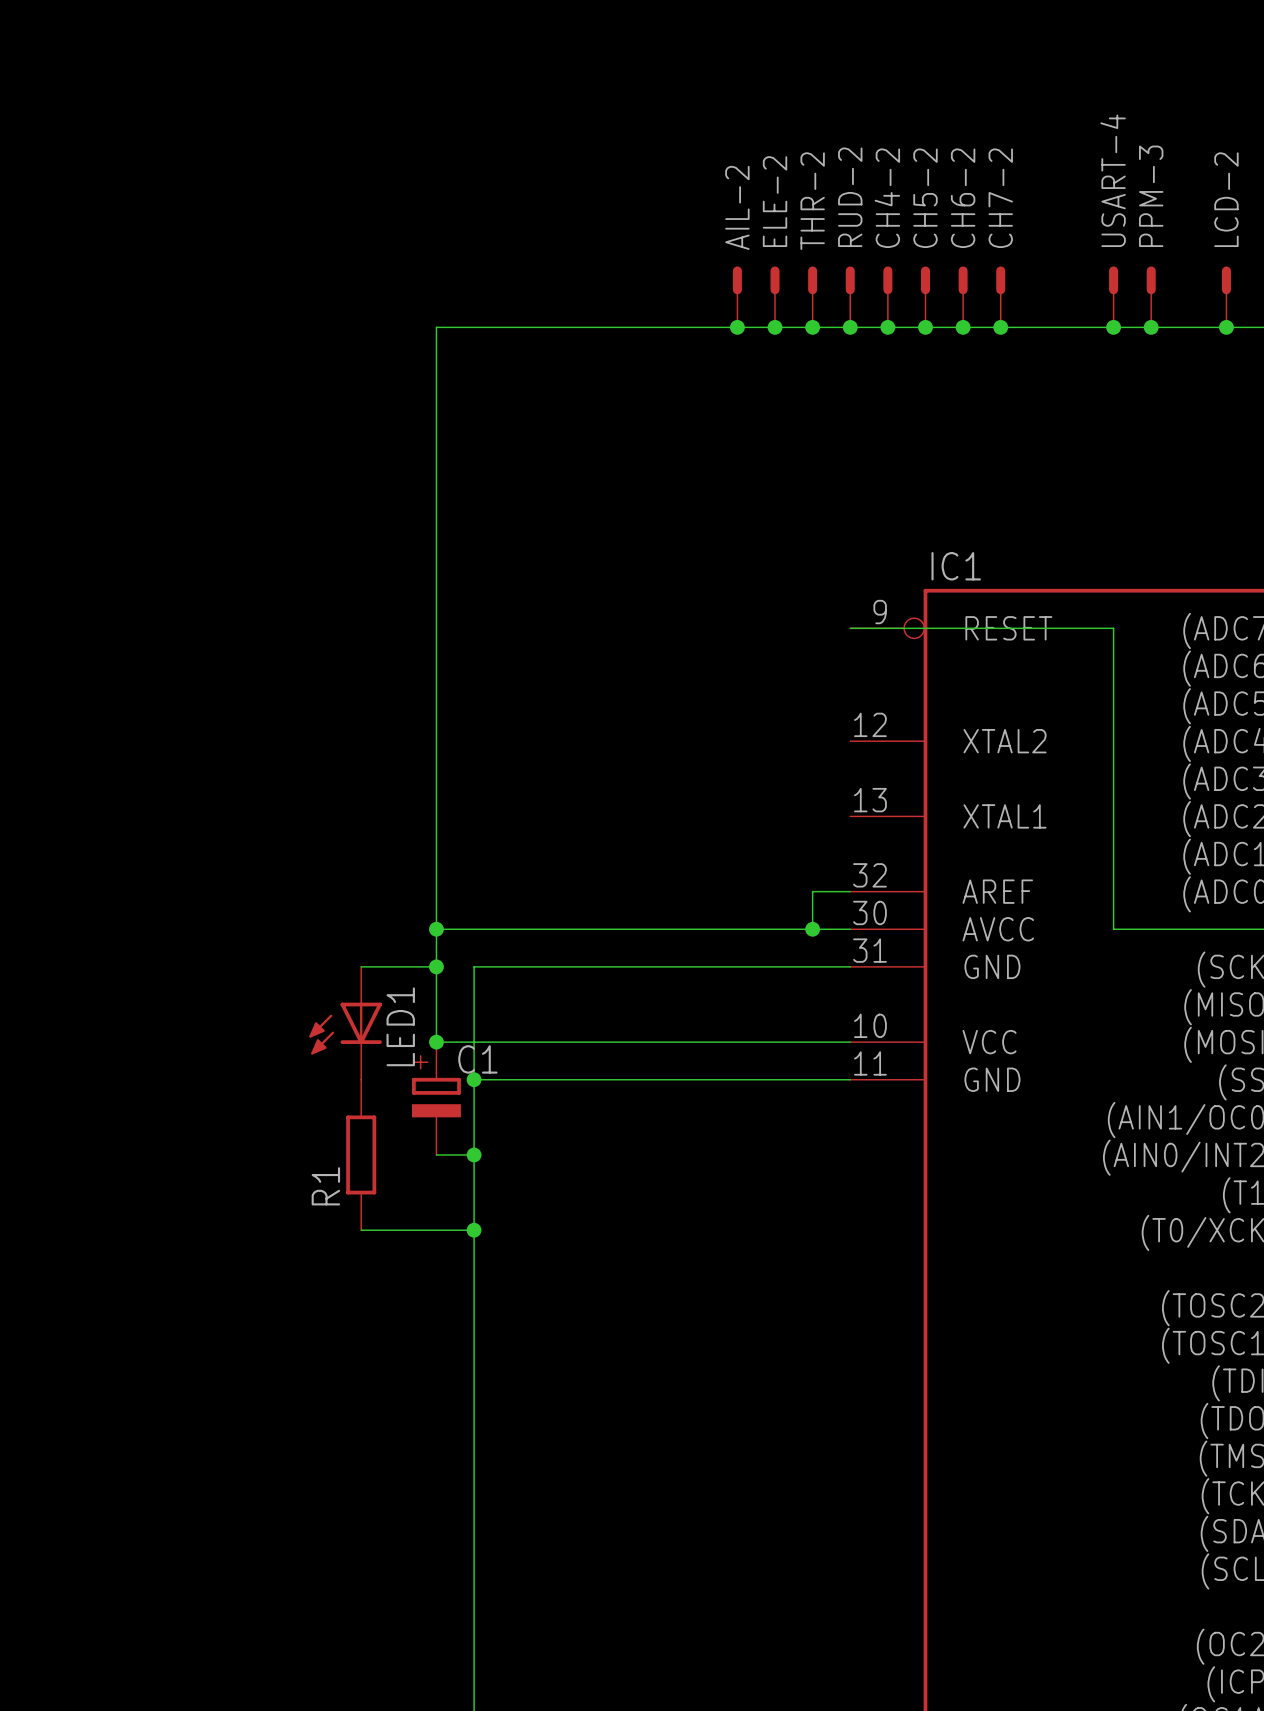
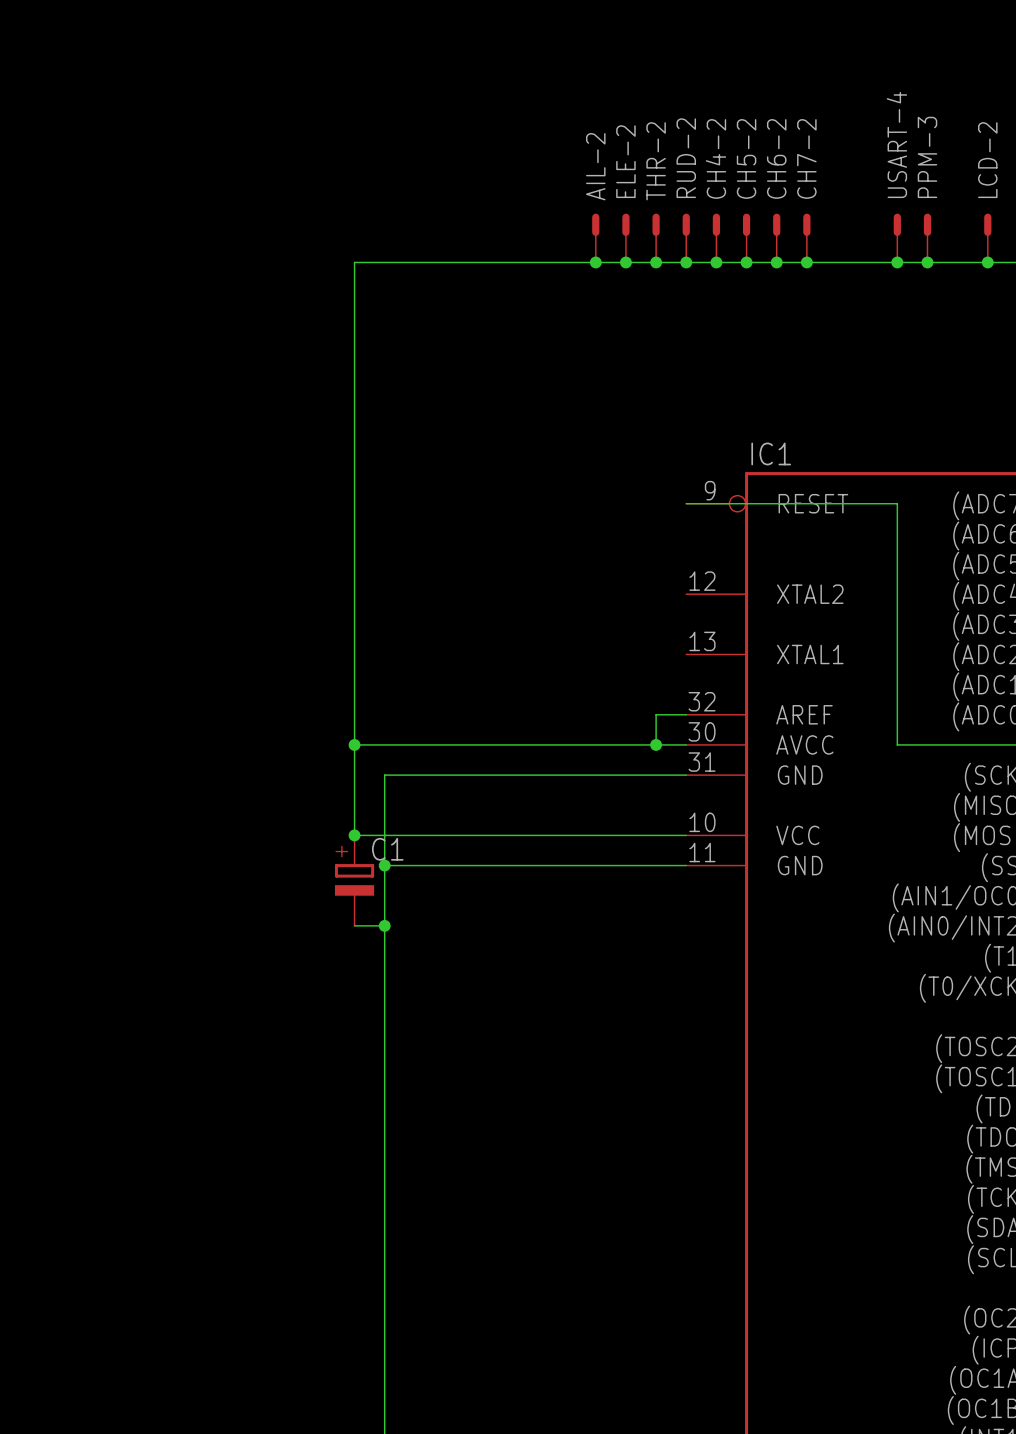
wire: (361, 966) (436, 966) -> none
junction: (436, 966) -> none
LED1: (345, 1023) -> none
R1: (361, 1154) -> none
wire: (361, 1230) (474, 1230) -> none
junction: (474, 1230) -> none

